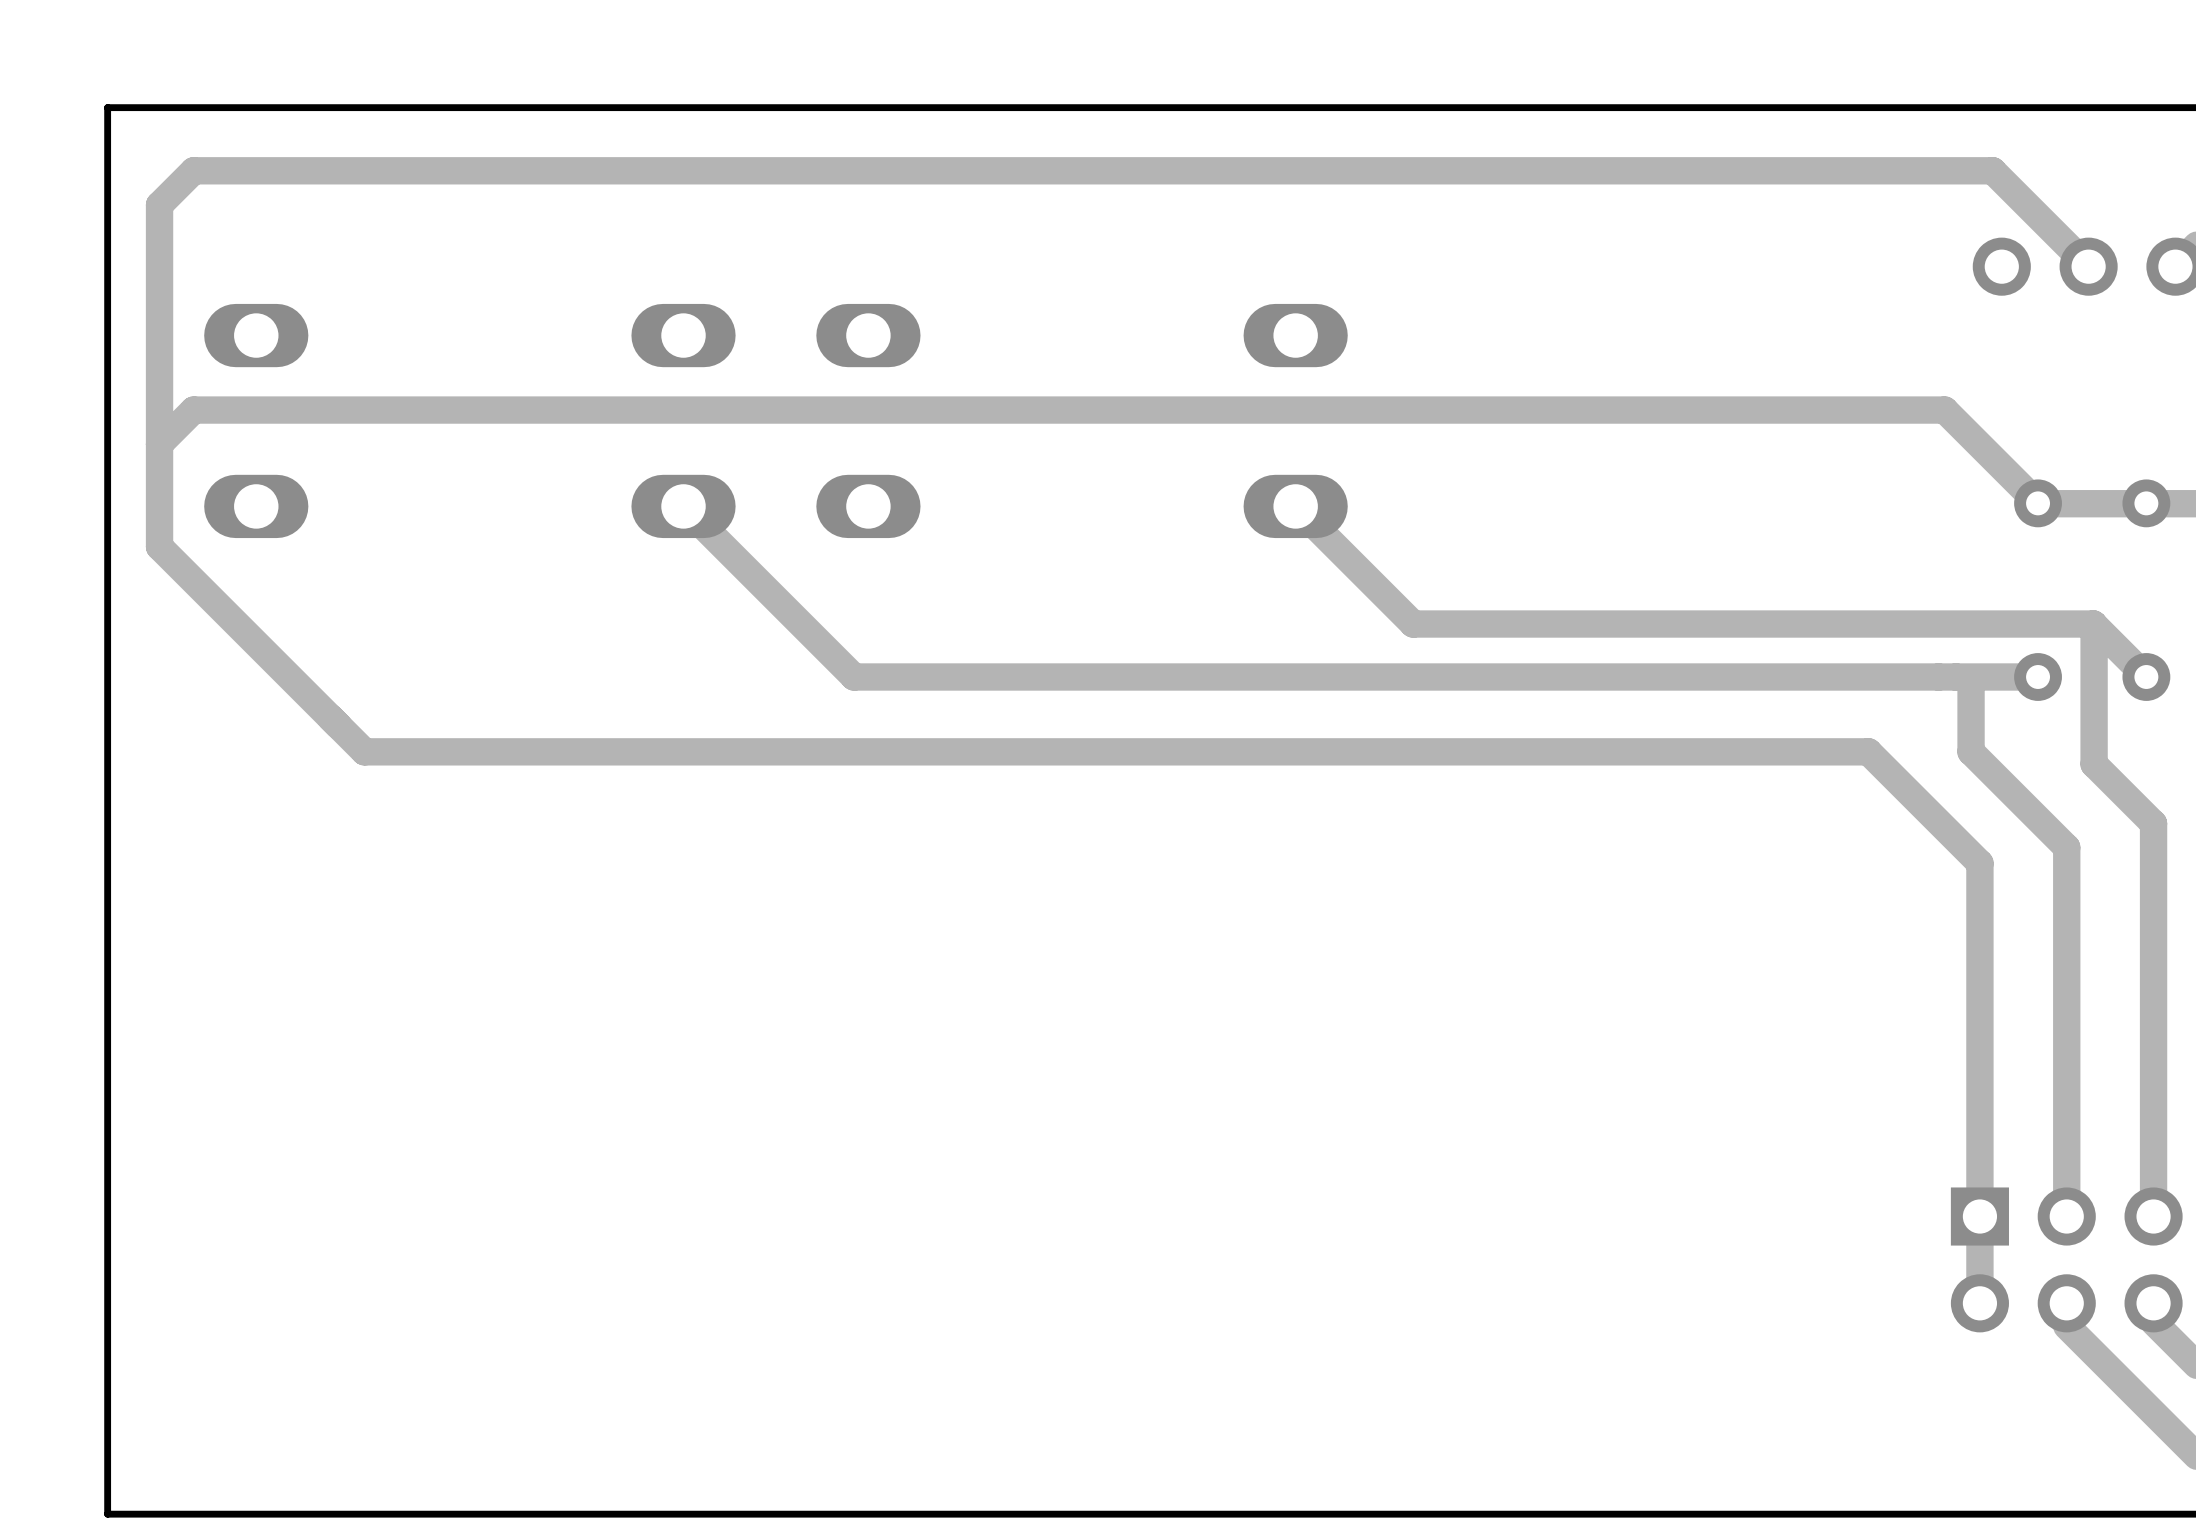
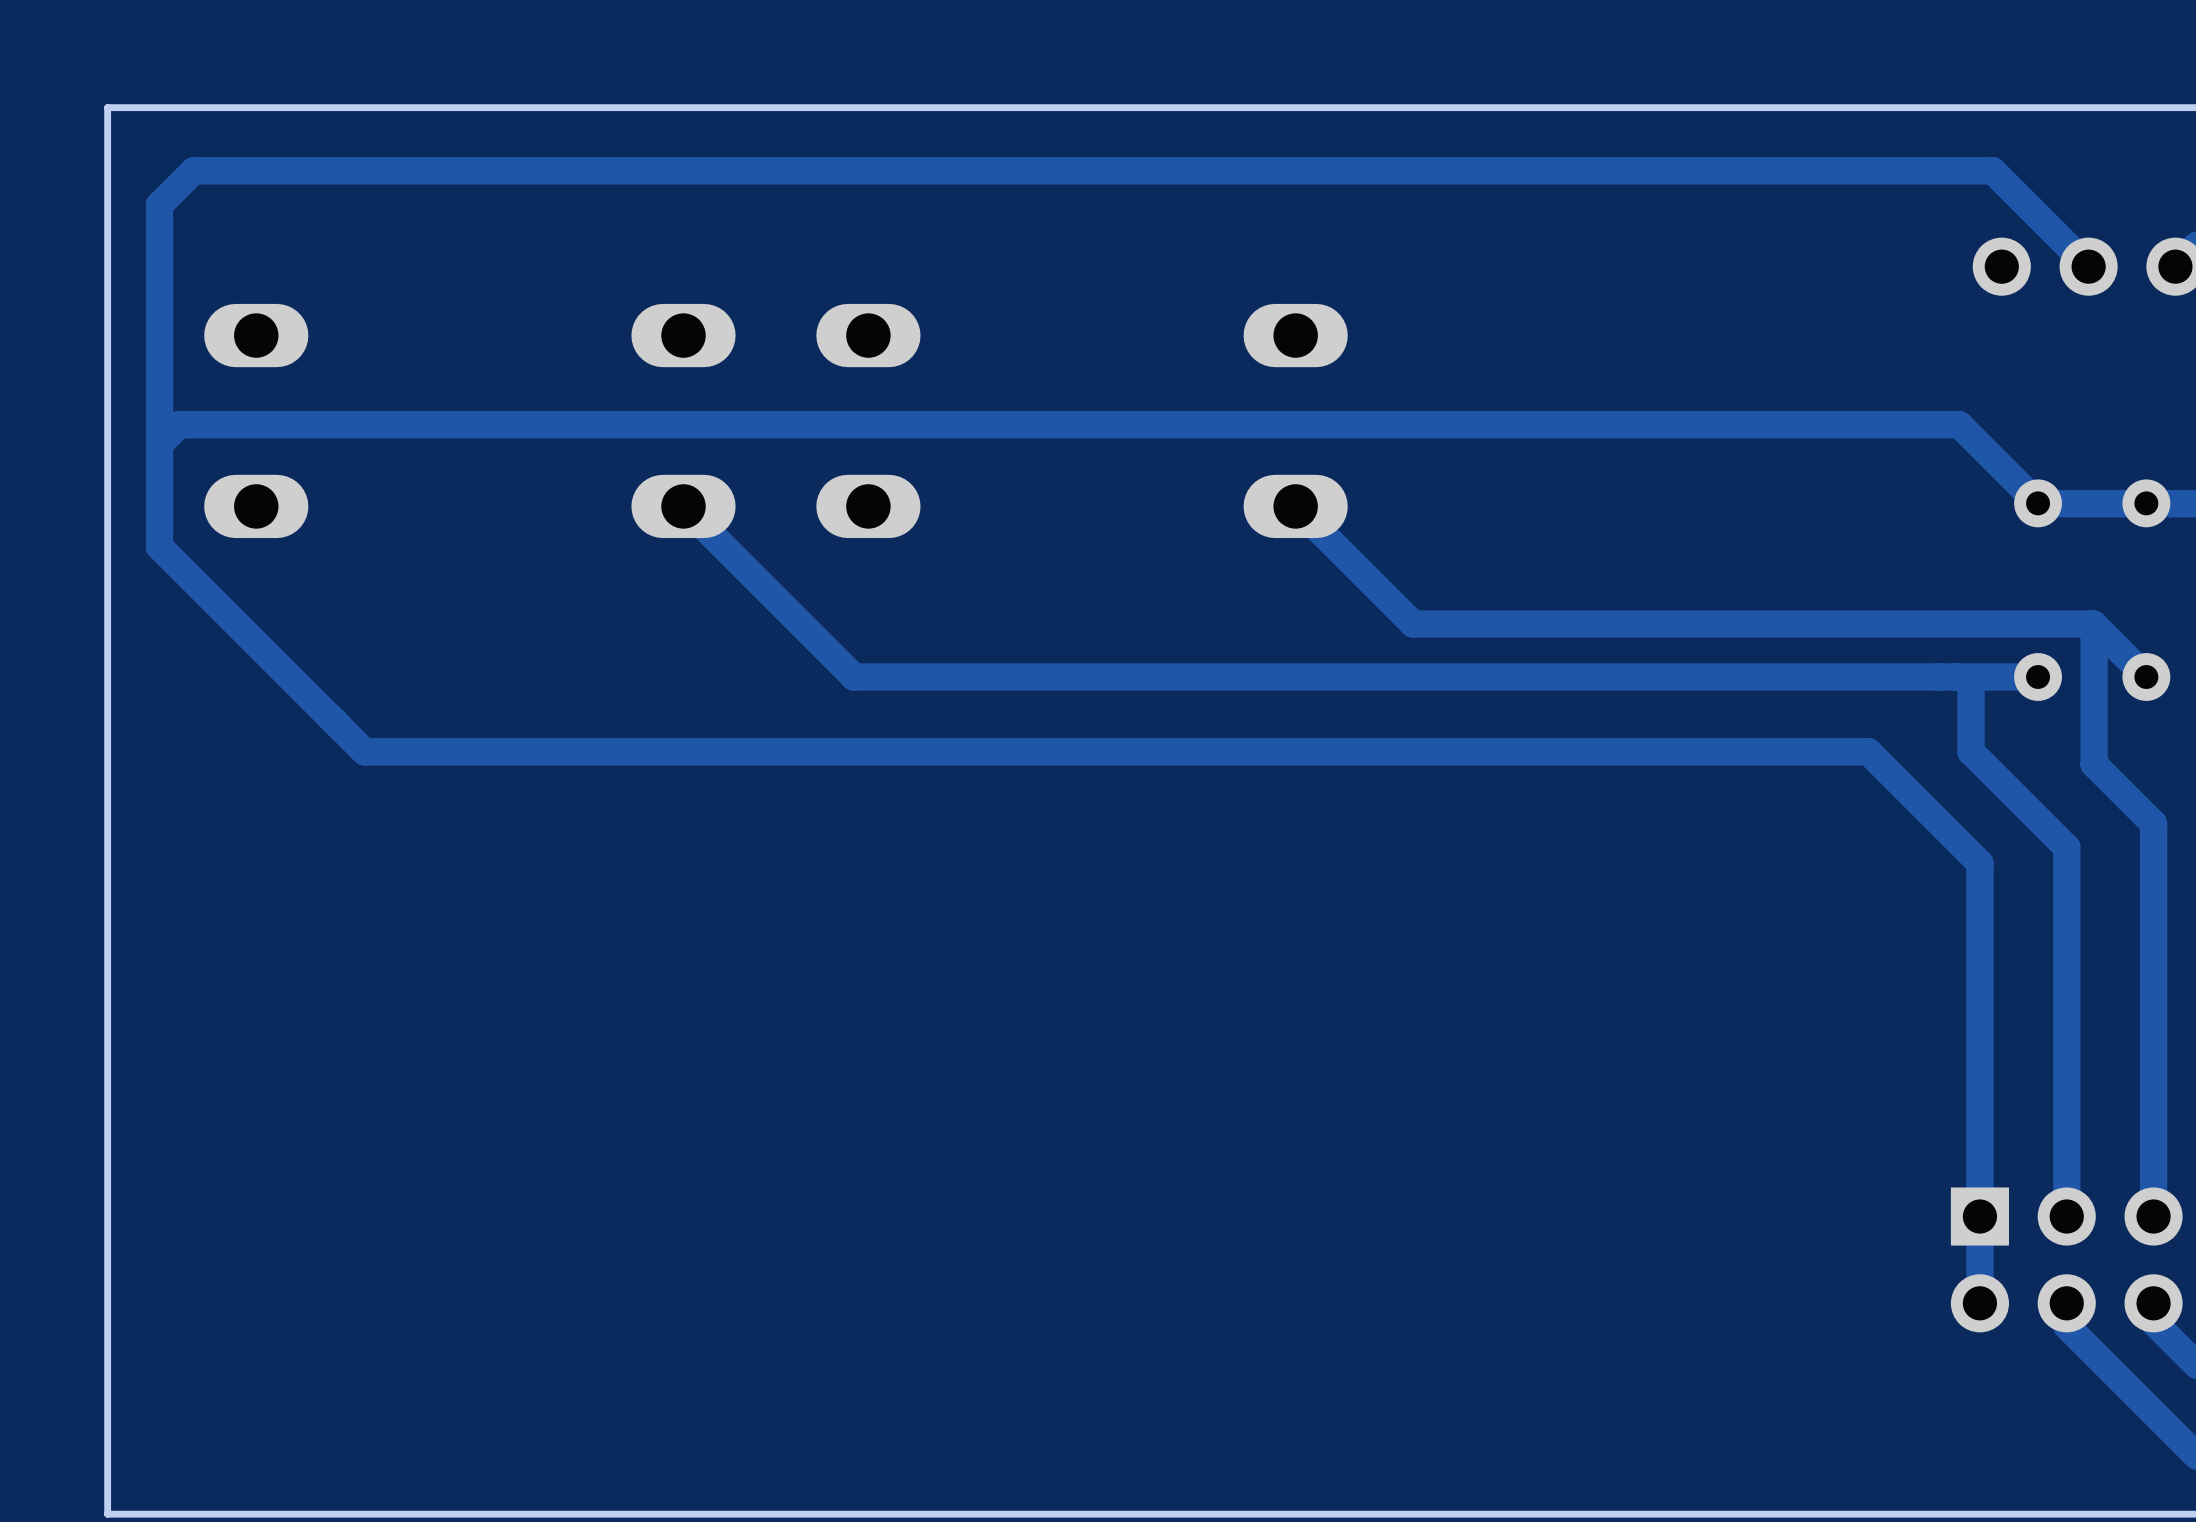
track: (1959, 424) (1944, 410) (193, 410) (179, 424) -> (1959, 424) (179, 424)

